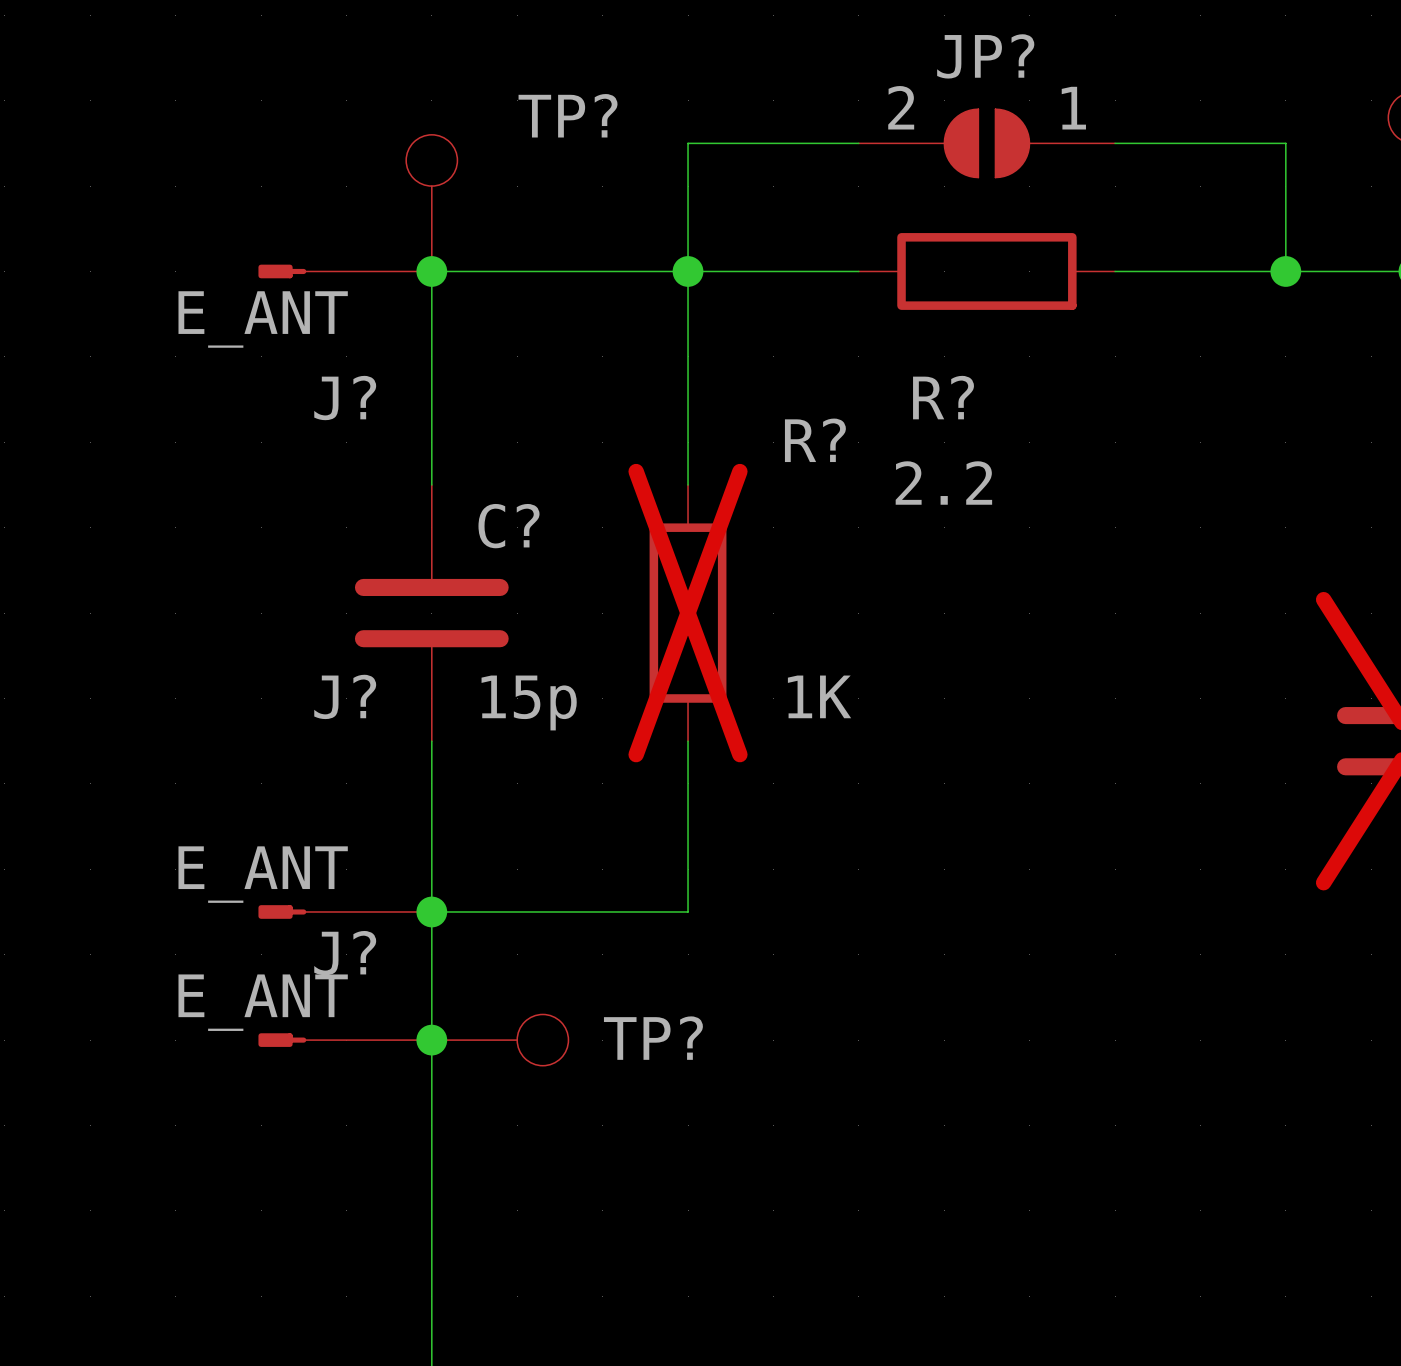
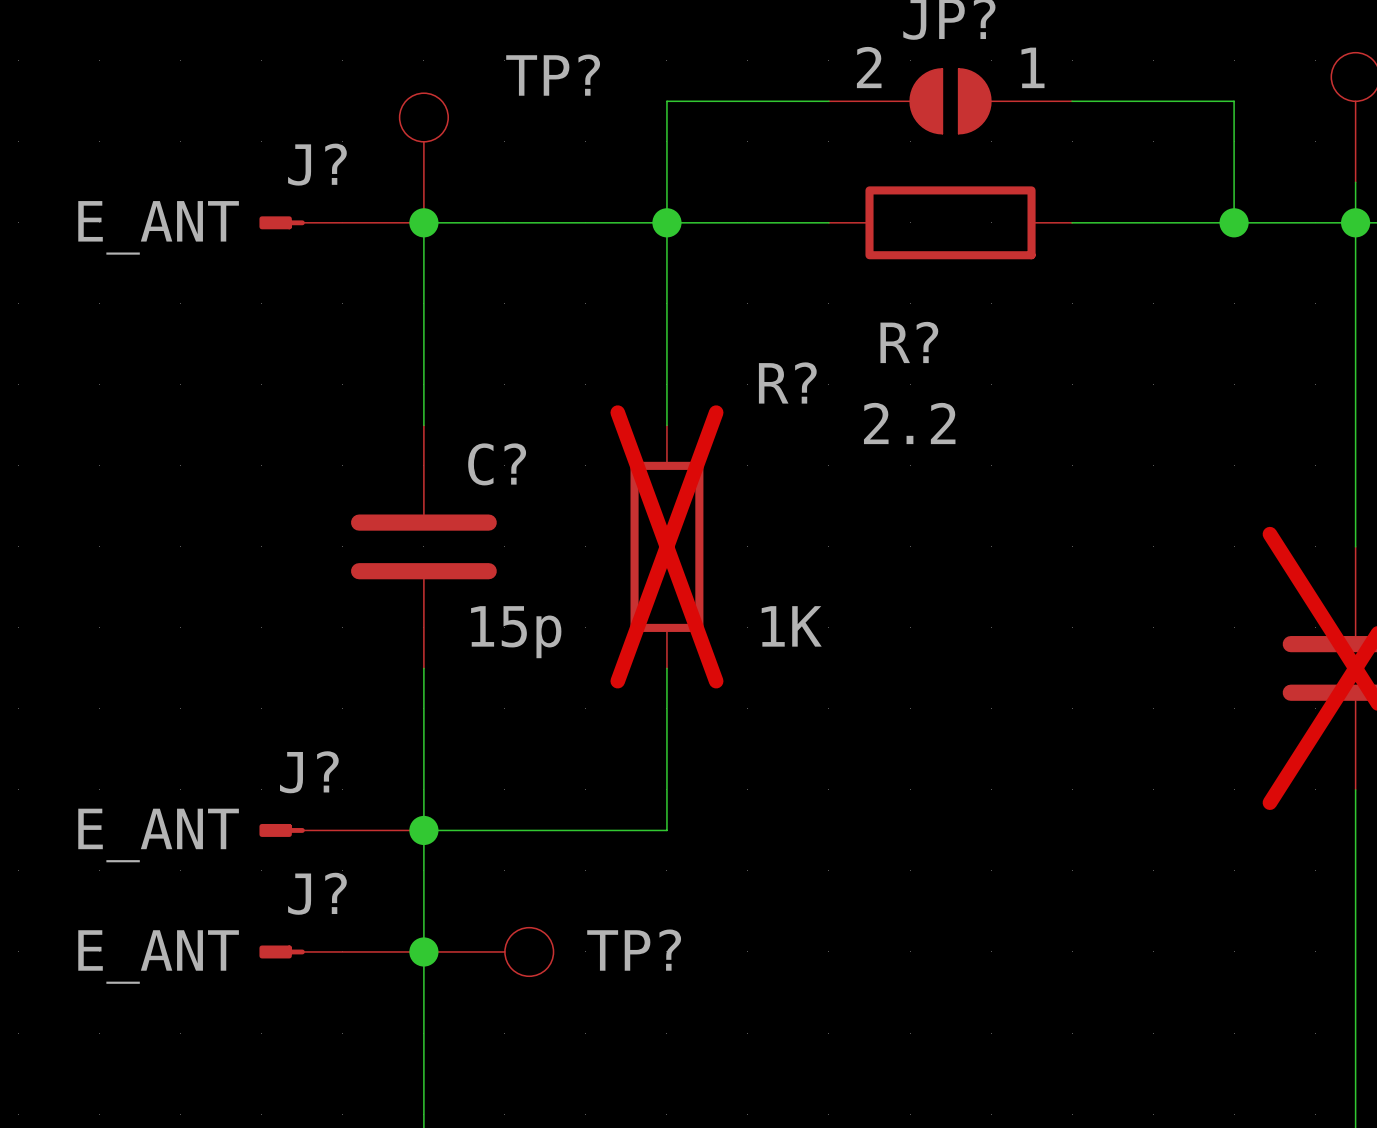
J? value position: E_ANT (263, 319) -> E_ANT (158, 227)
J? name position: J? (345, 398) -> J? (317, 164)
J? name position: J? (345, 696) -> J? (309, 772)
J? value position: E_ANT (263, 874) -> E_ANT (158, 835)
J? name position: J? (345, 953) -> J? (317, 893)
J? value position: E_ANT (263, 1002) -> E_ANT (158, 957)

